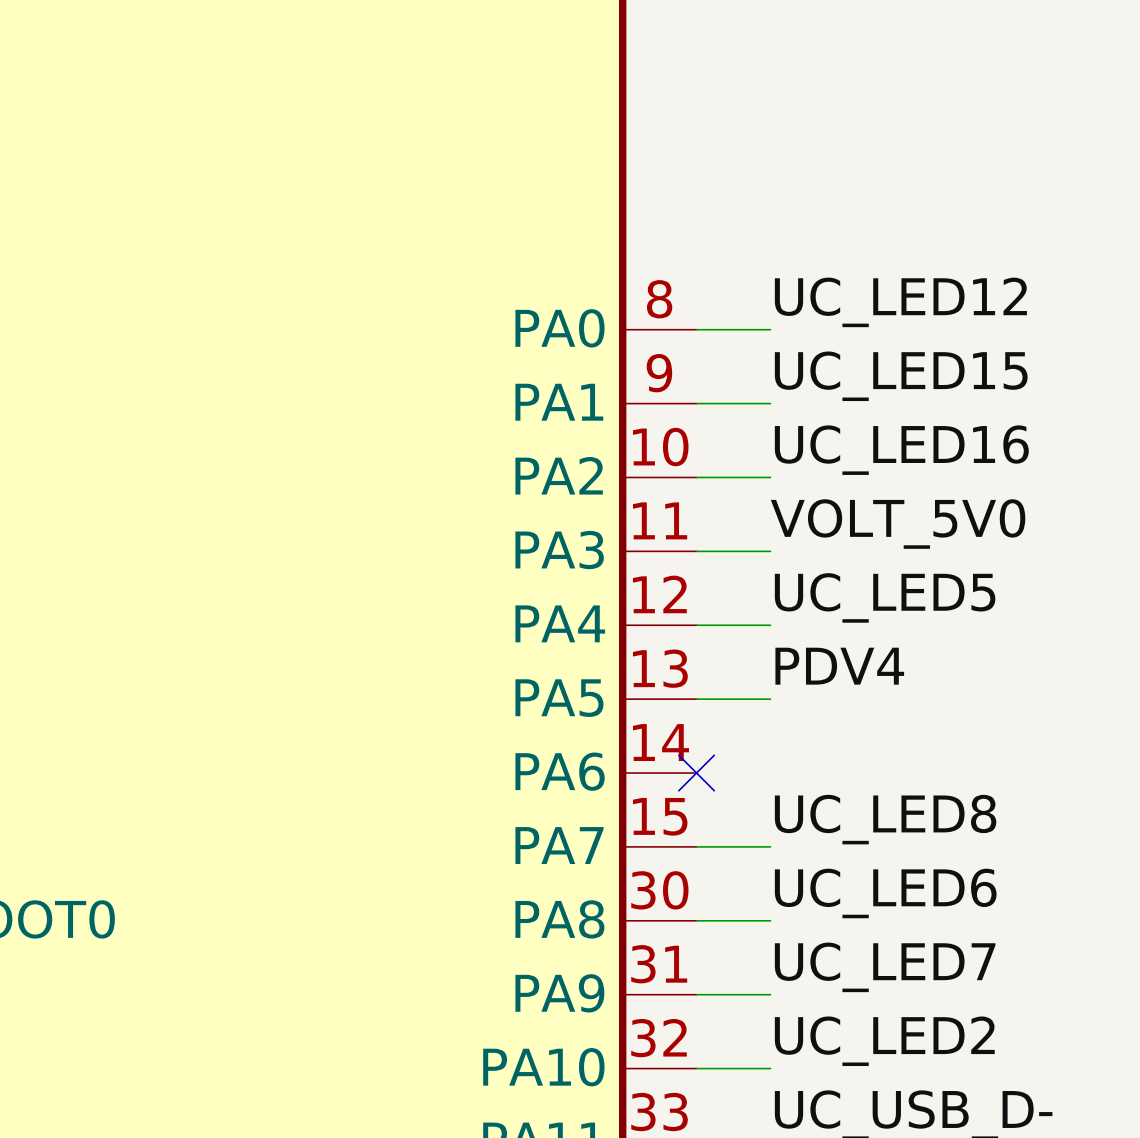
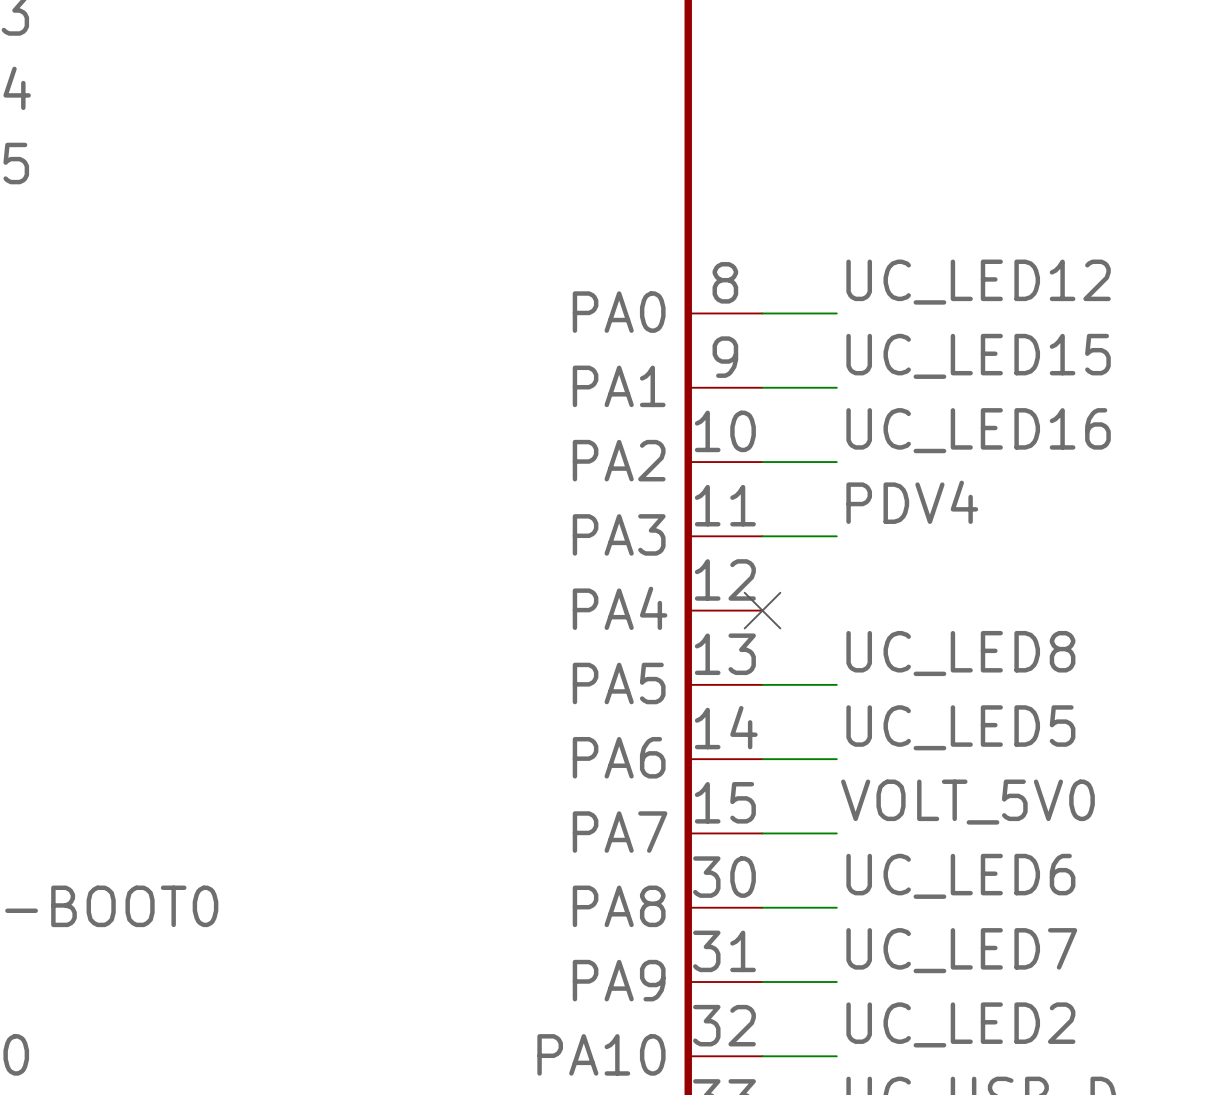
label: VOLT_5V0 (898, 524) -> PDV4 (912, 502)
label position: UC_LED5 (885, 597) -> UC_LED5 (960, 727)
wire: (696, 625) (770, 625) -> (762, 759) (836, 759)
label: PDV4 (839, 666) -> UC_LED8 (960, 653)
no-connect mark position: (696, 773) -> (762, 610)
label: UC_LED8 (885, 819) -> VOLT_5V0 (967, 802)

